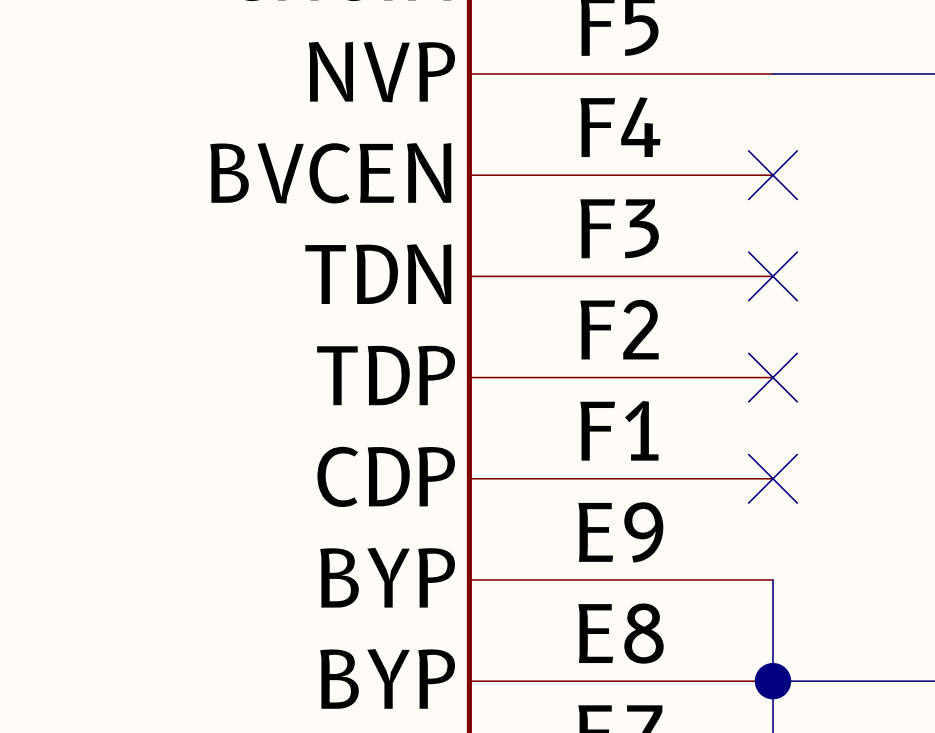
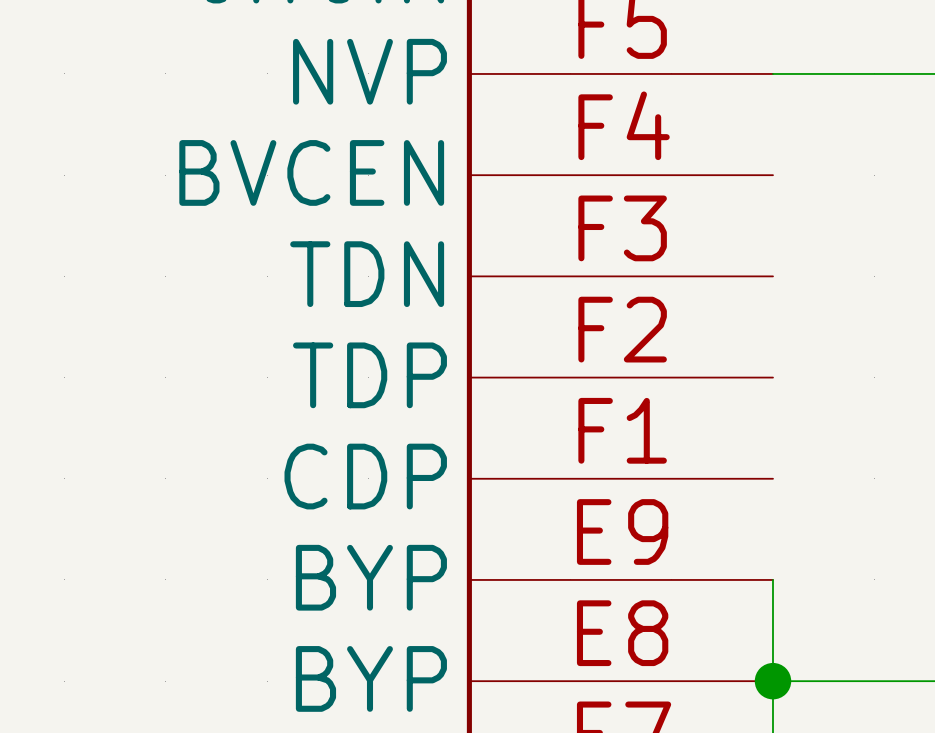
no-connect mark: (772, 175) -> none
no-connect mark: (772, 276) -> none
no-connect mark: (772, 377) -> none
no-connect mark: (772, 478) -> none

